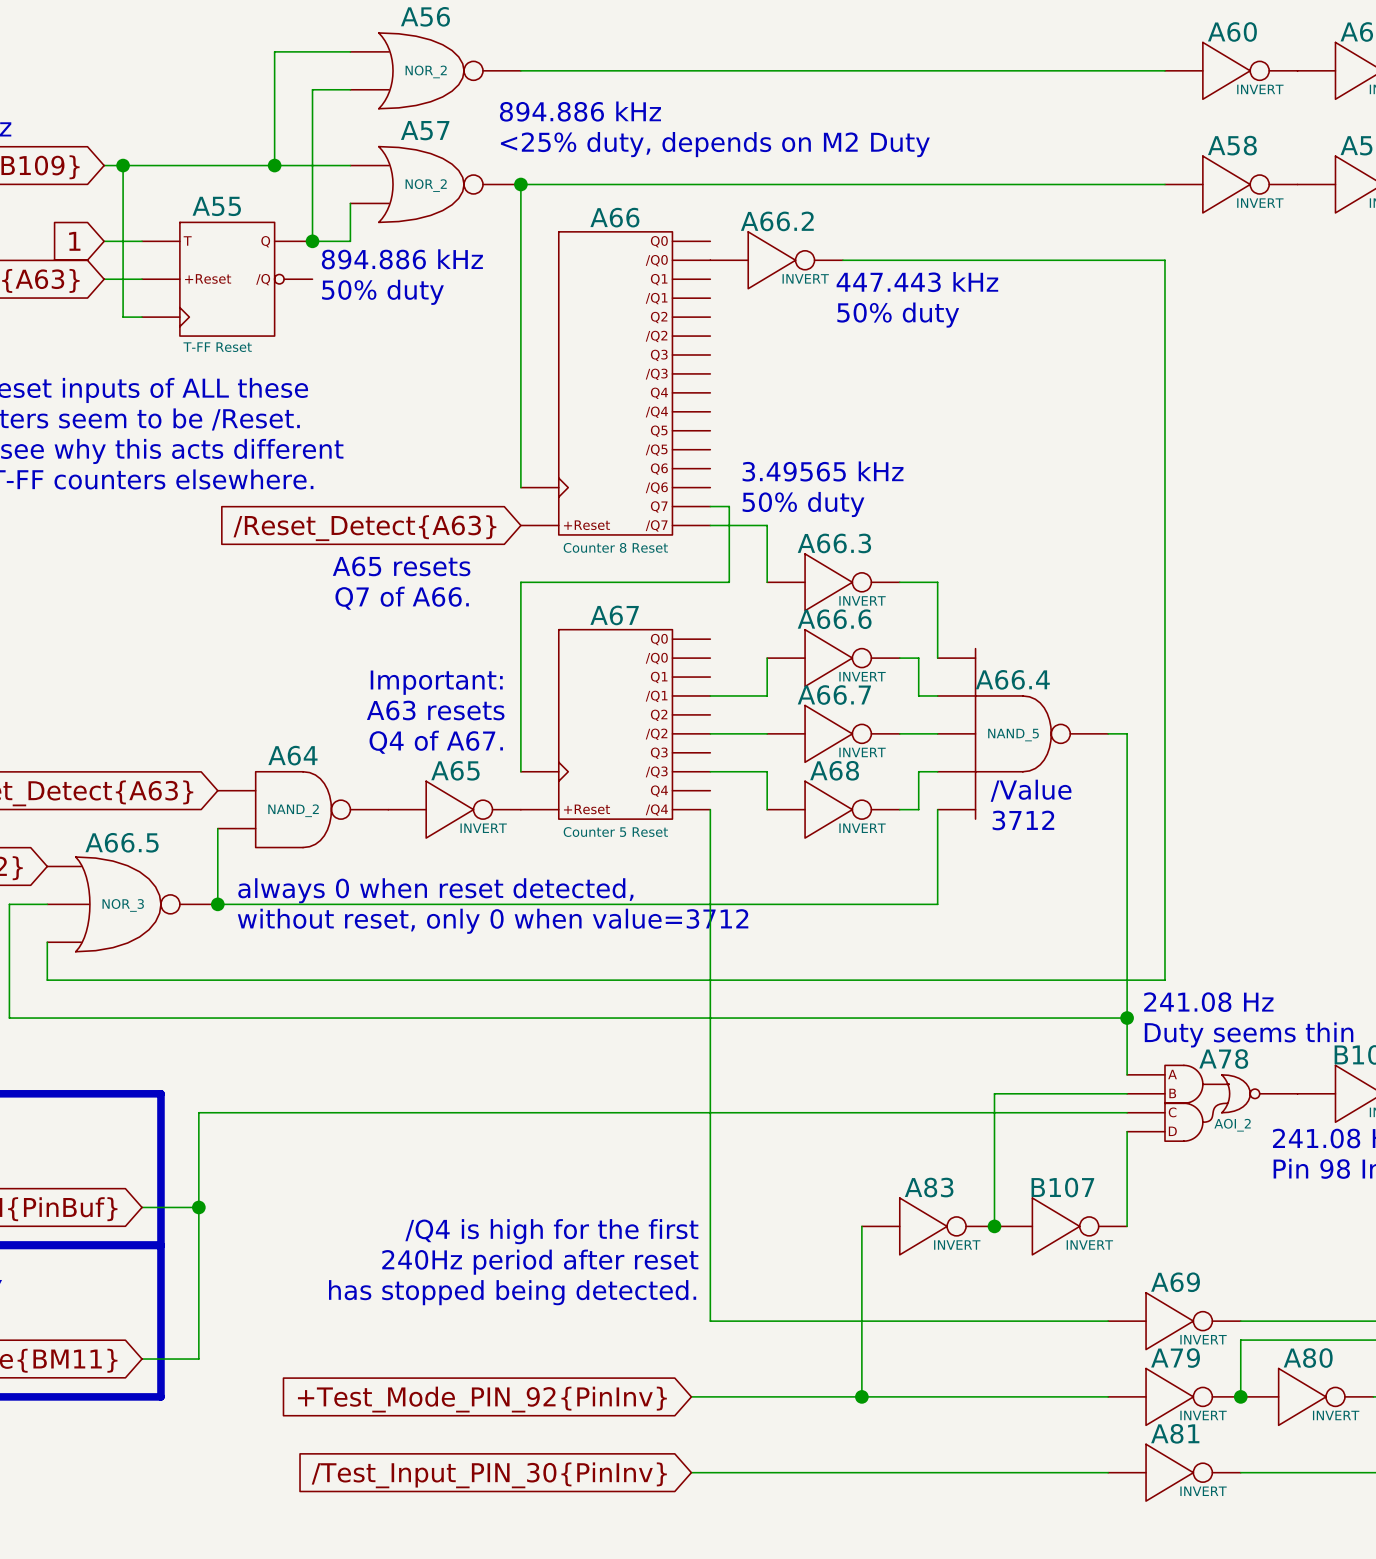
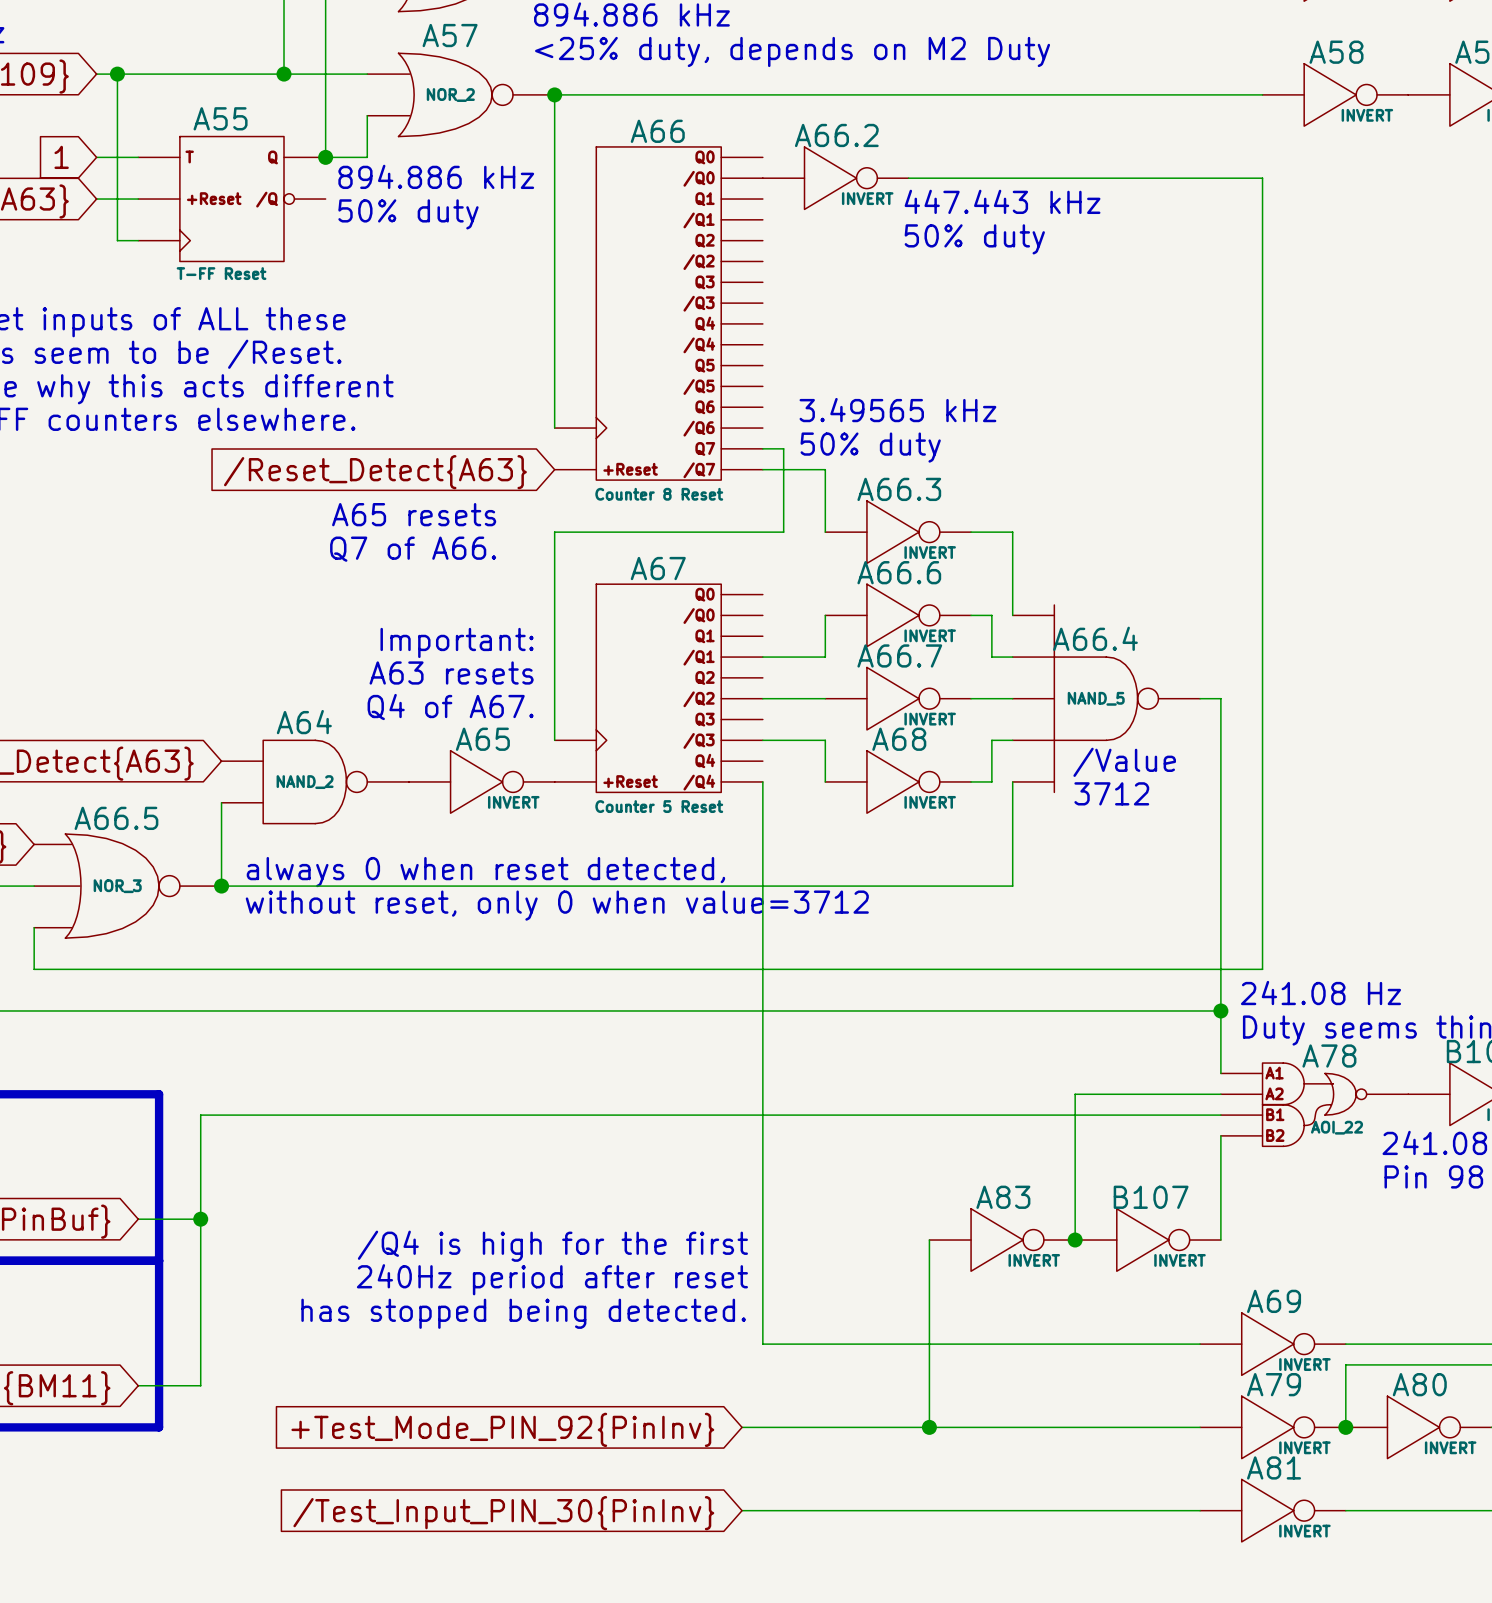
A78 text: A (1172, 1074) -> none
A78 text: none -> A1 (1274, 1073)
A78 text: B (1172, 1093) -> none
A78 text: none -> A2 (1274, 1093)
A78 text: C (1172, 1112) -> none
A78 text: none -> B1 (1275, 1114)
A78 value: AOI_2 (1232, 1125) -> AOI_22 (1336, 1127)
A78 text: D (1172, 1131) -> none
A78 text: none -> B2 (1275, 1135)

